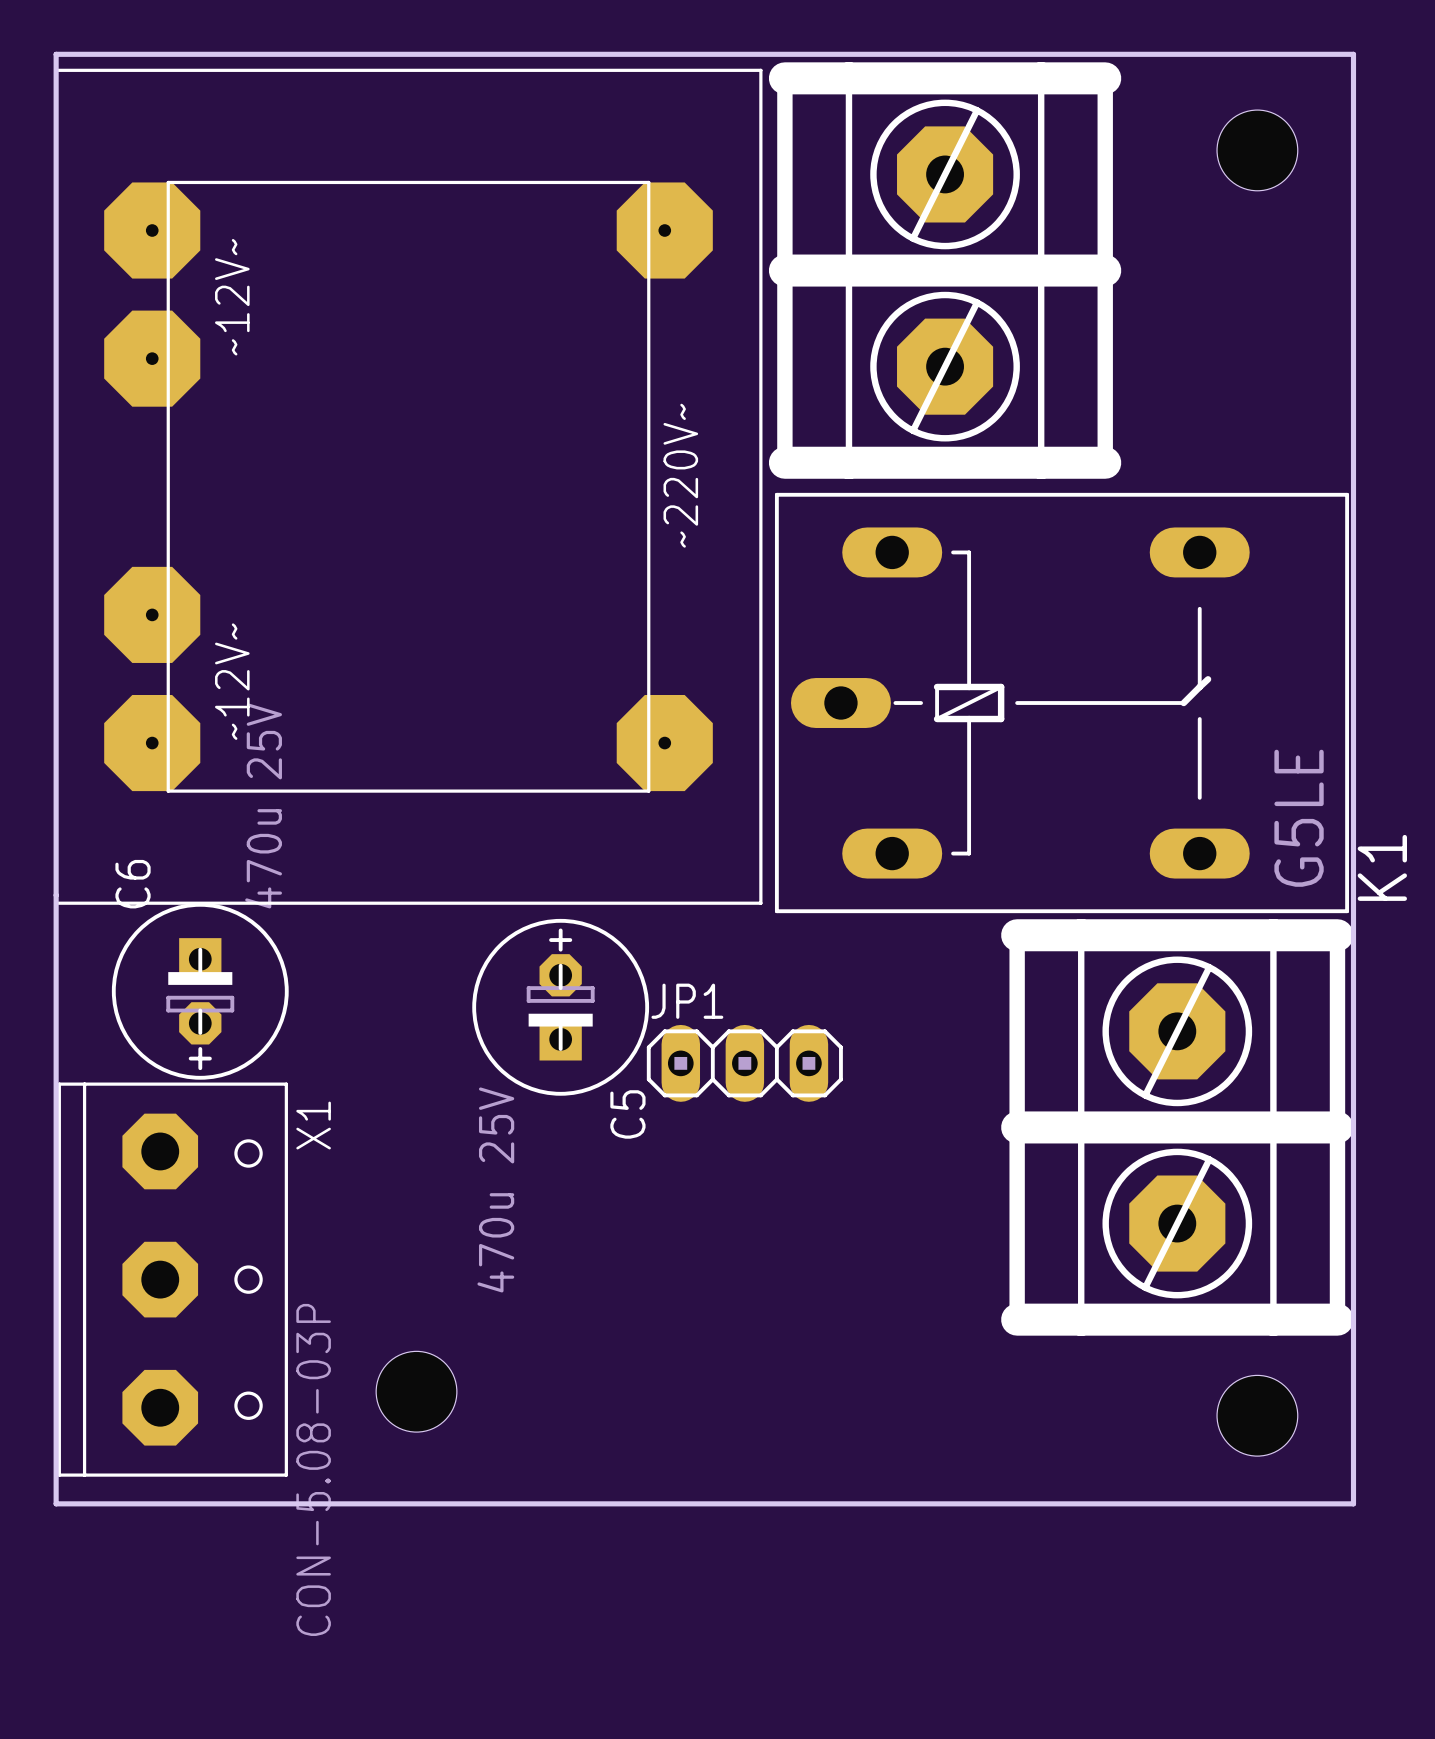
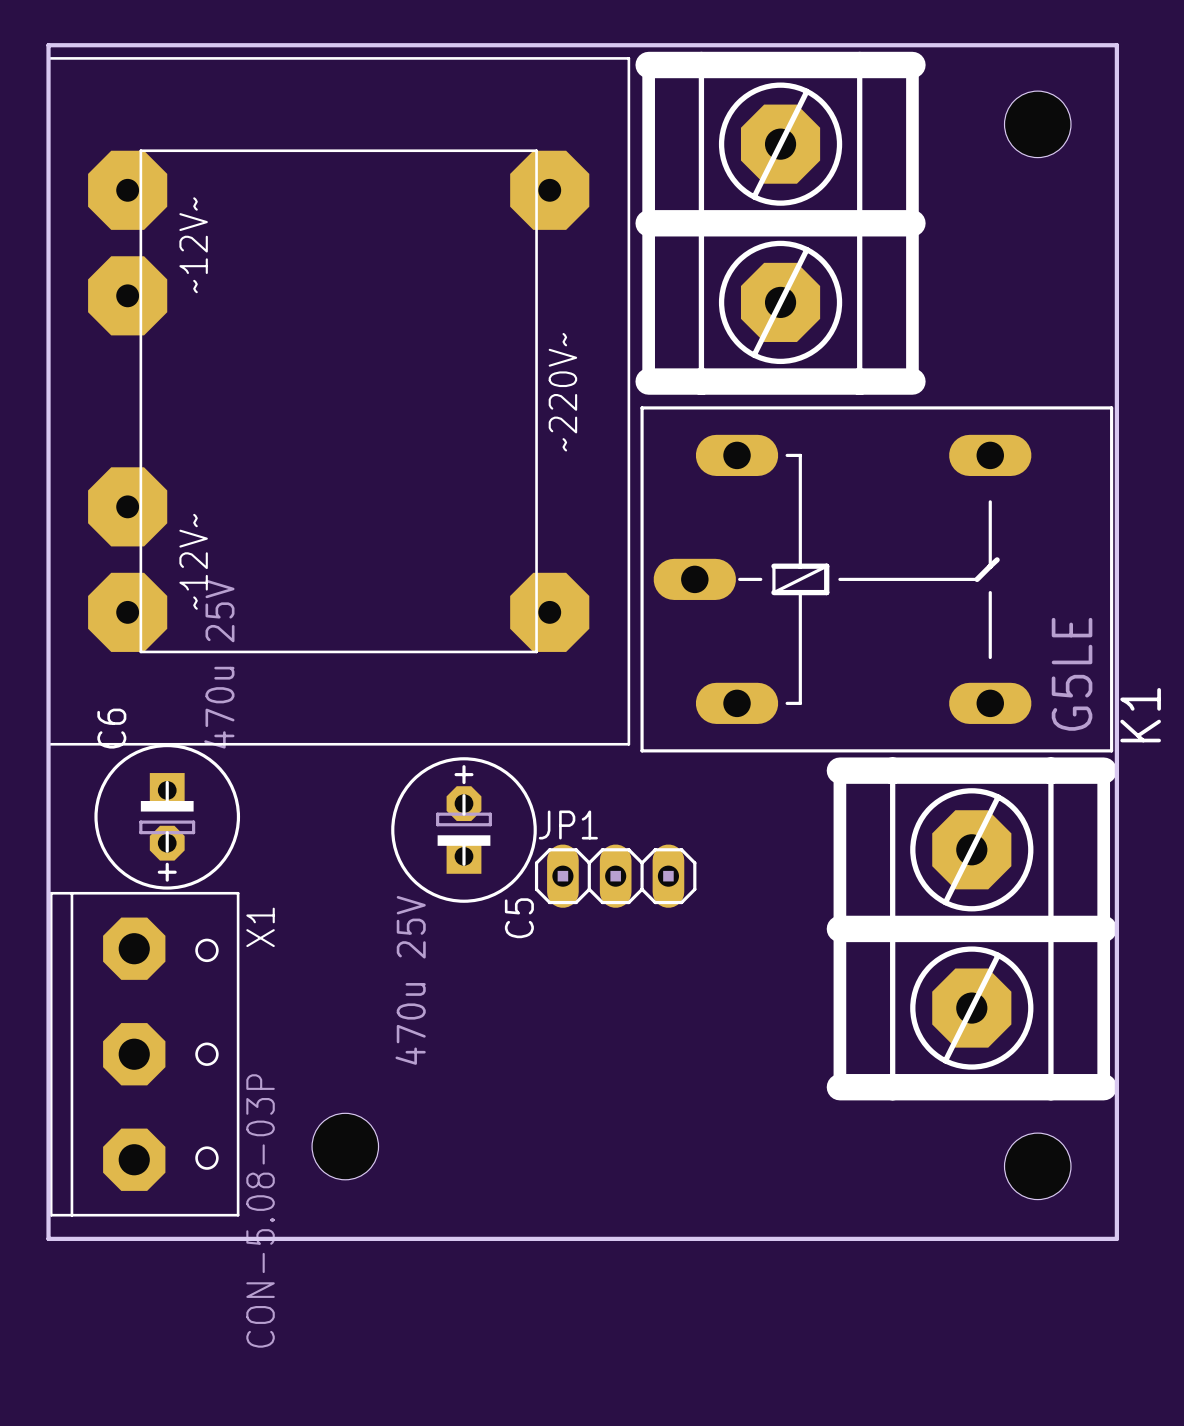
part footprint: [54, 68, 763, 905] -> [47, 57, 631, 746]

